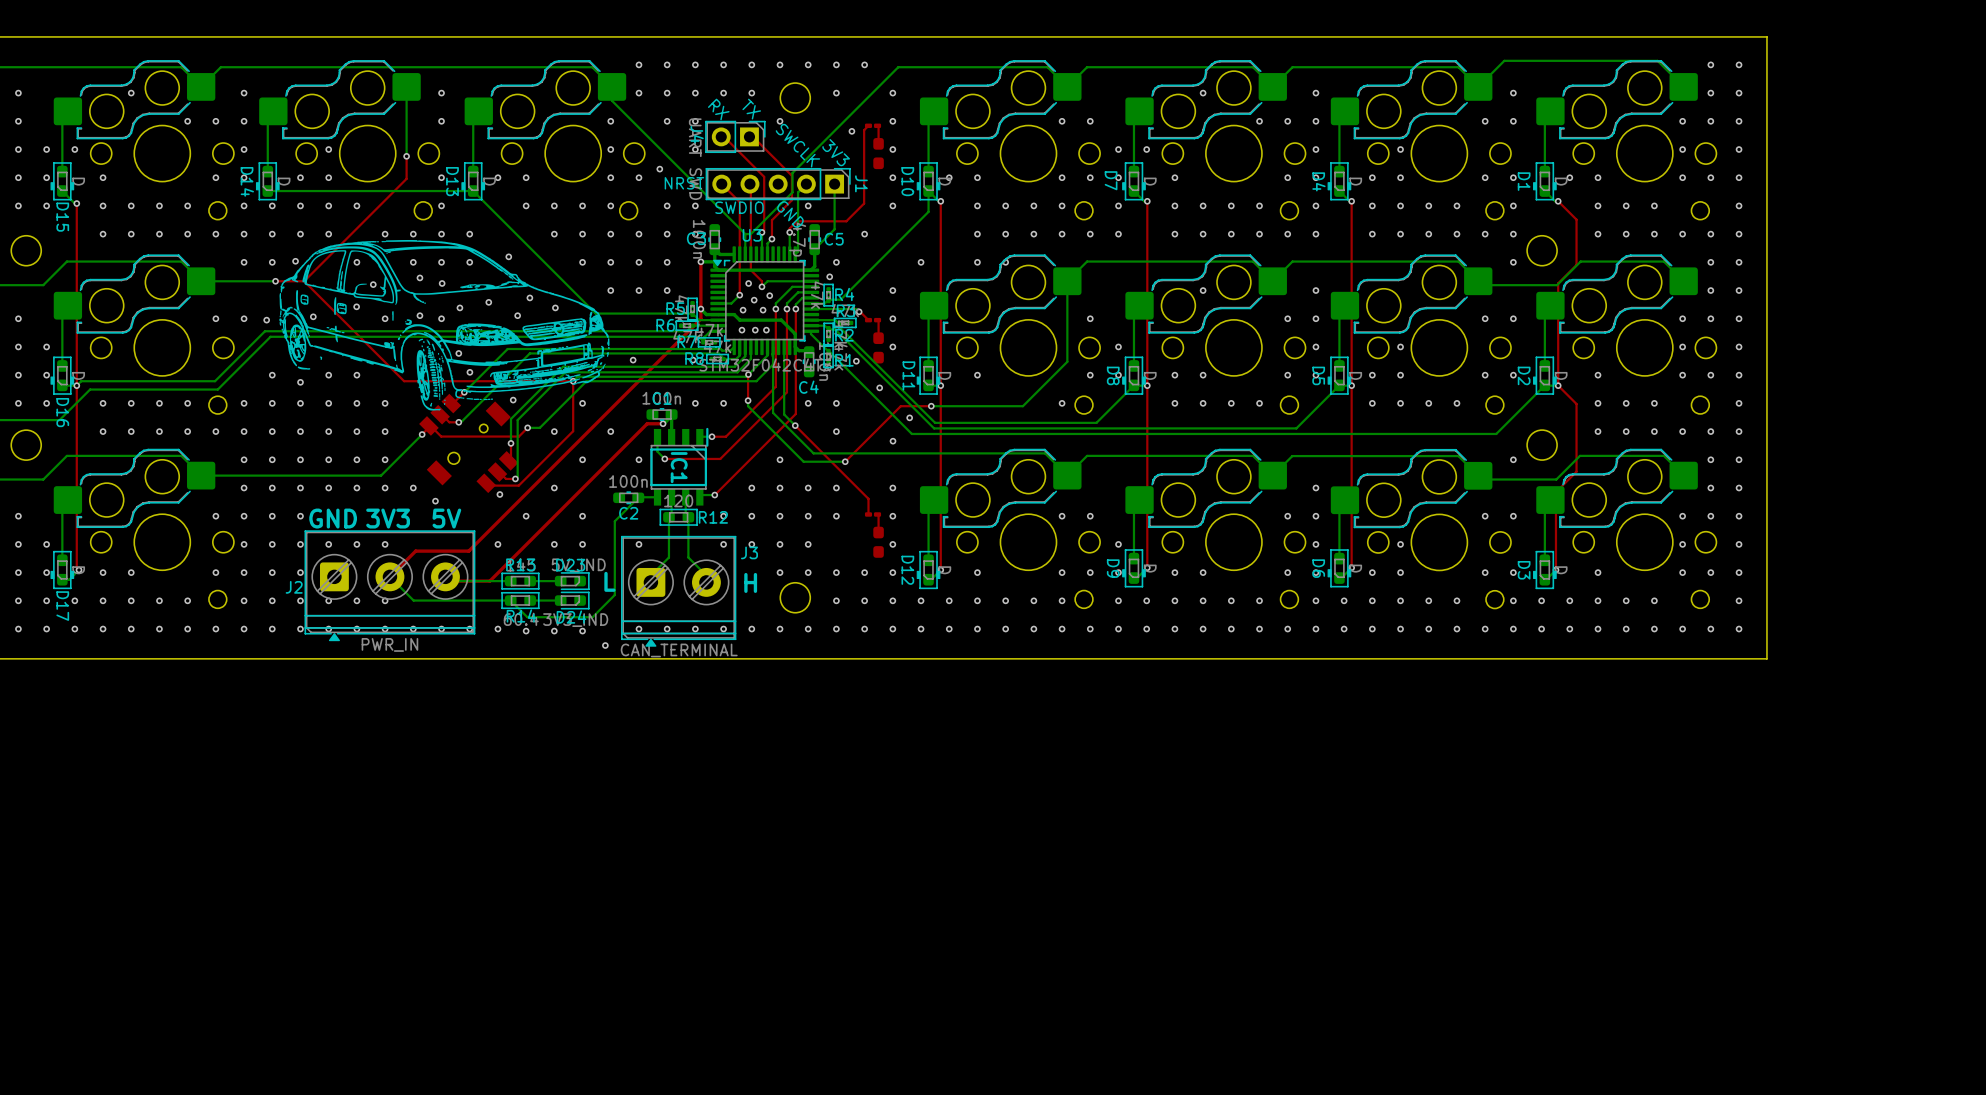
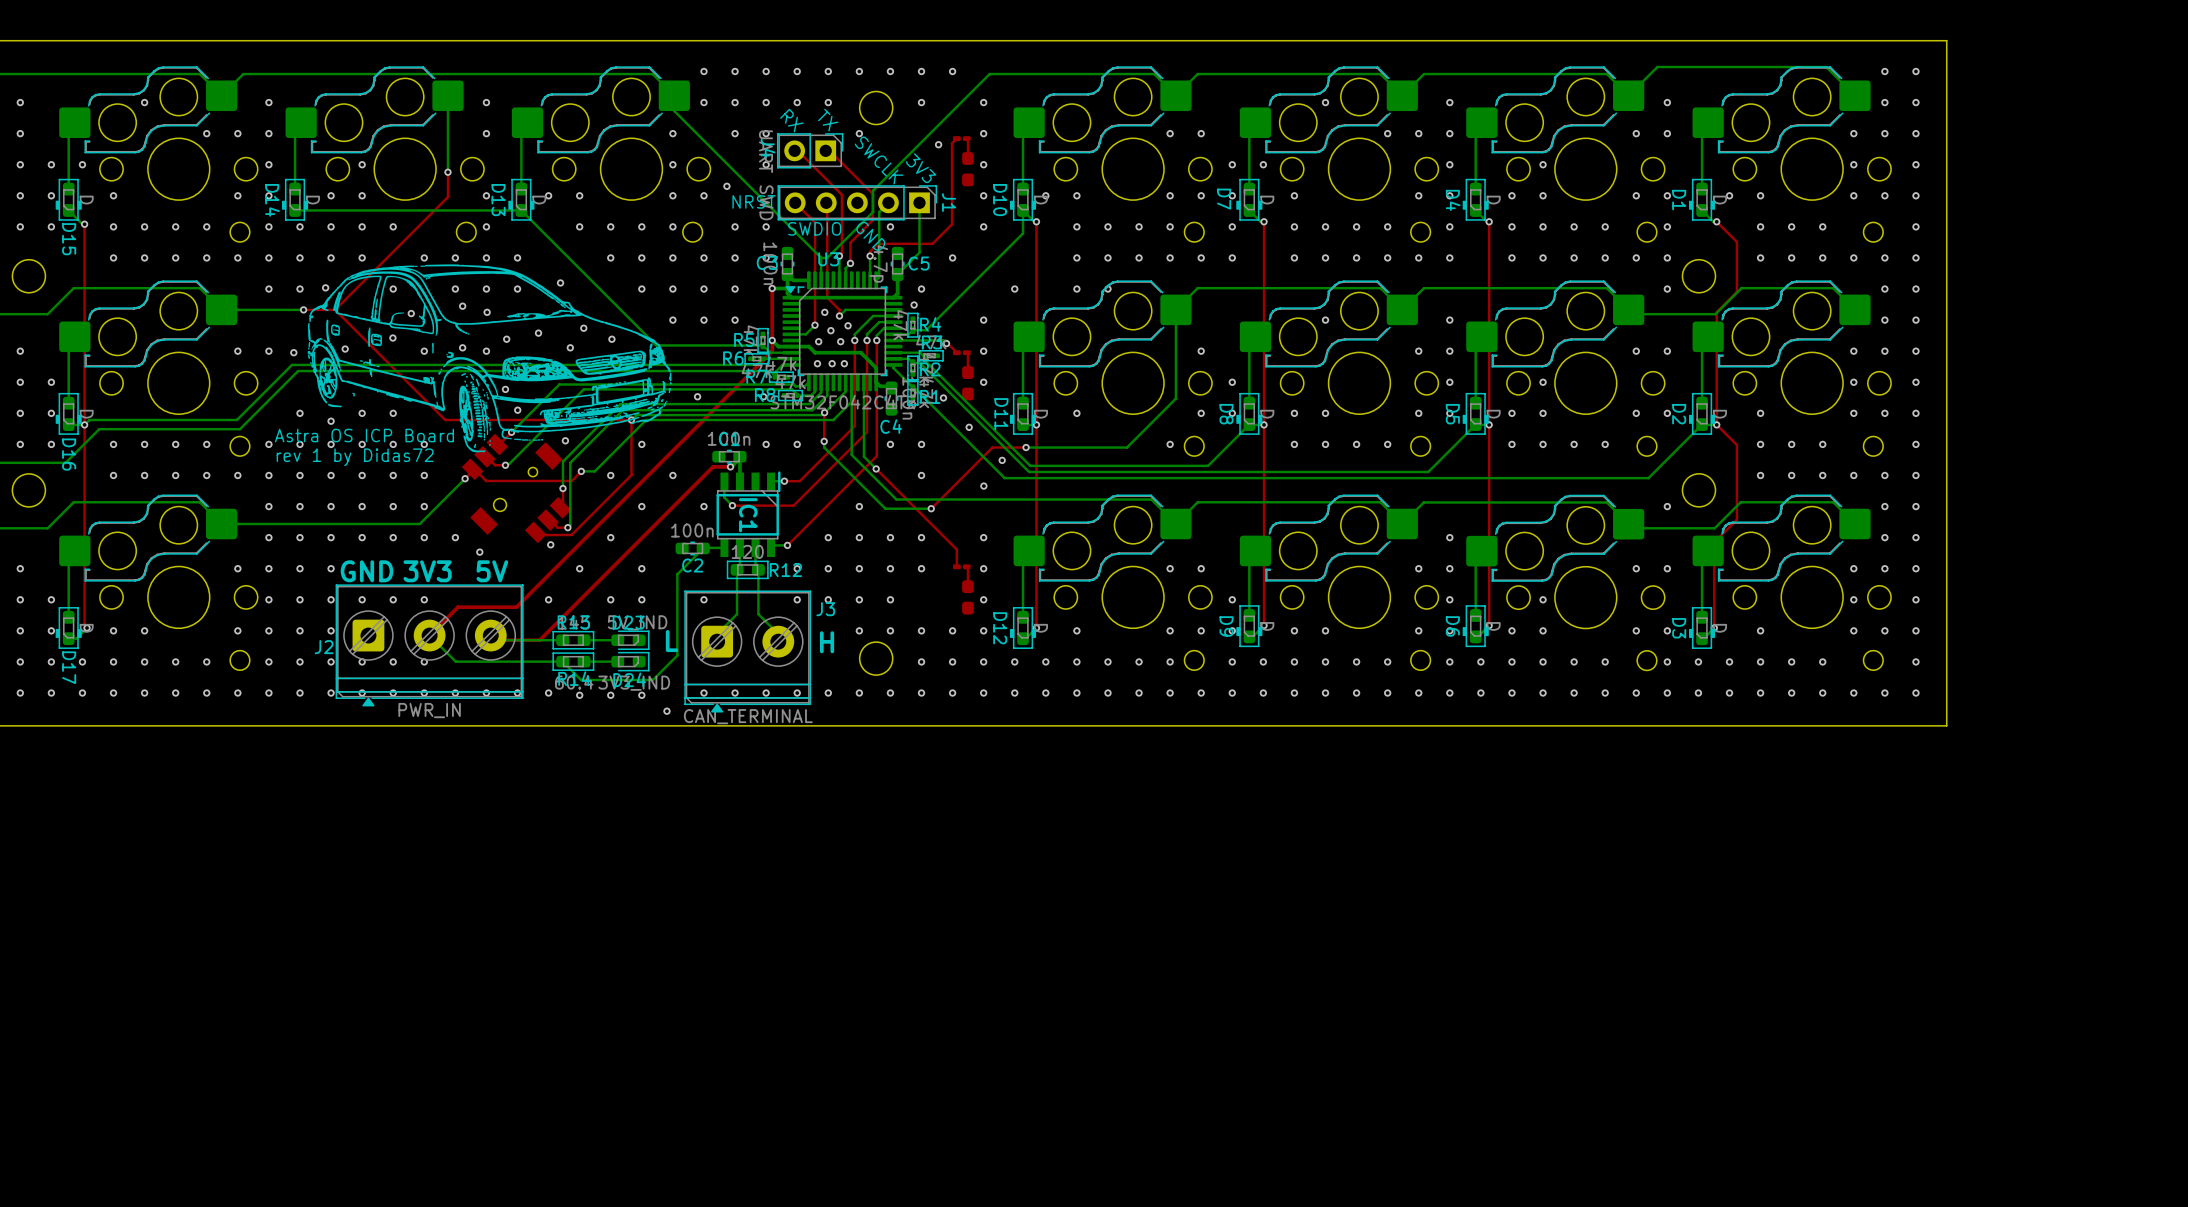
text: none -> Astra OS ICP Board (364, 435)
text: none -> rev 1 by Didas72 (355, 457)

